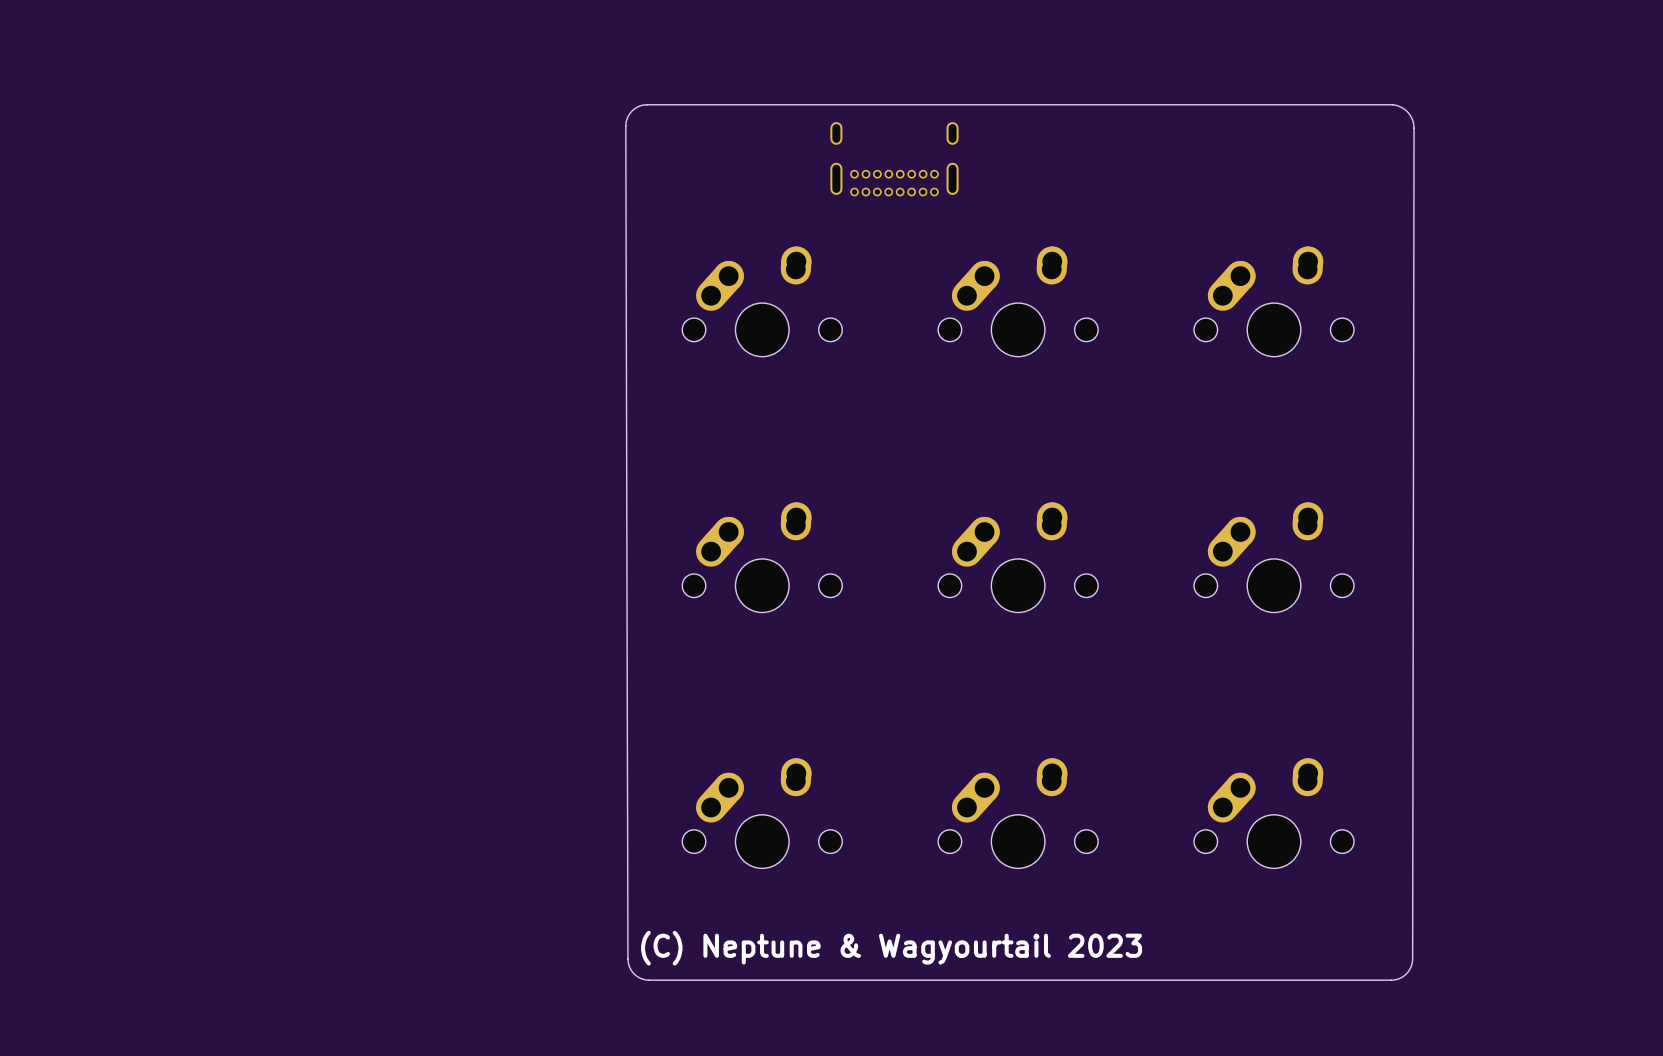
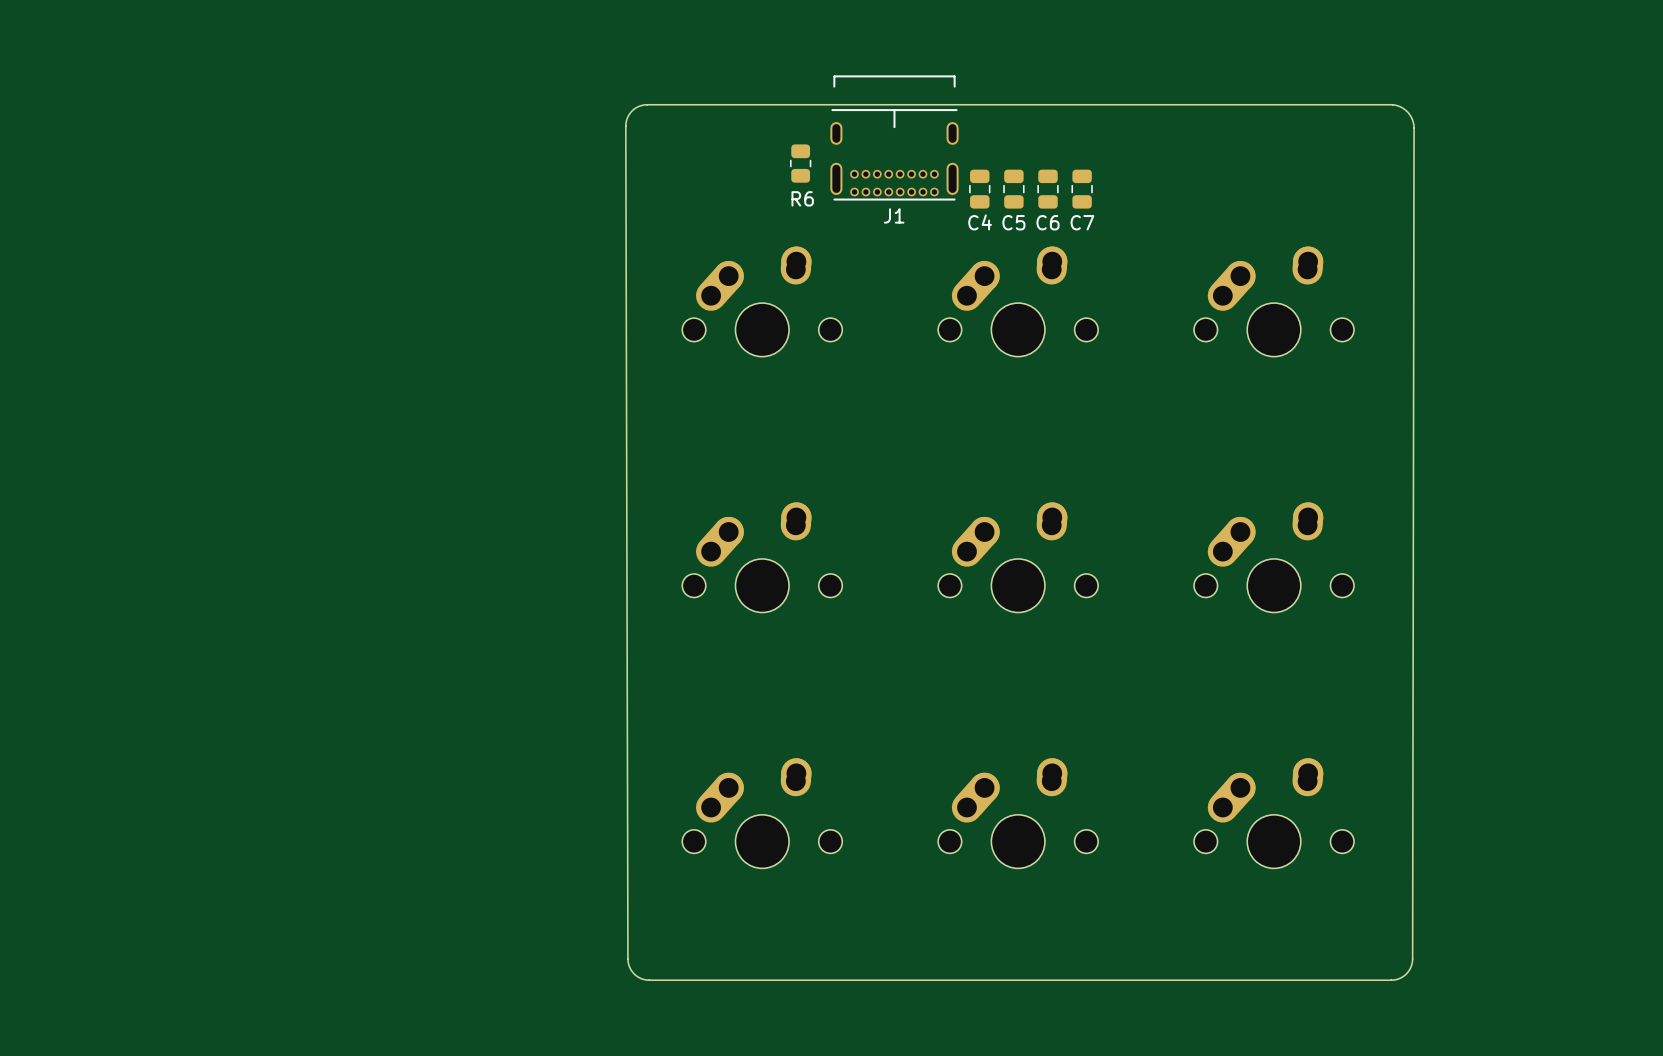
J1 side: bottom (894, 159) -> top (894, 137)
R6: none -> (800, 163)
C4: none -> (979, 189)
C5: none -> (1013, 189)
C6: none -> (1048, 189)
C7: none -> (1082, 189)
text: (C) Neptune & Wagyourtail 2023 (891, 948) -> none

